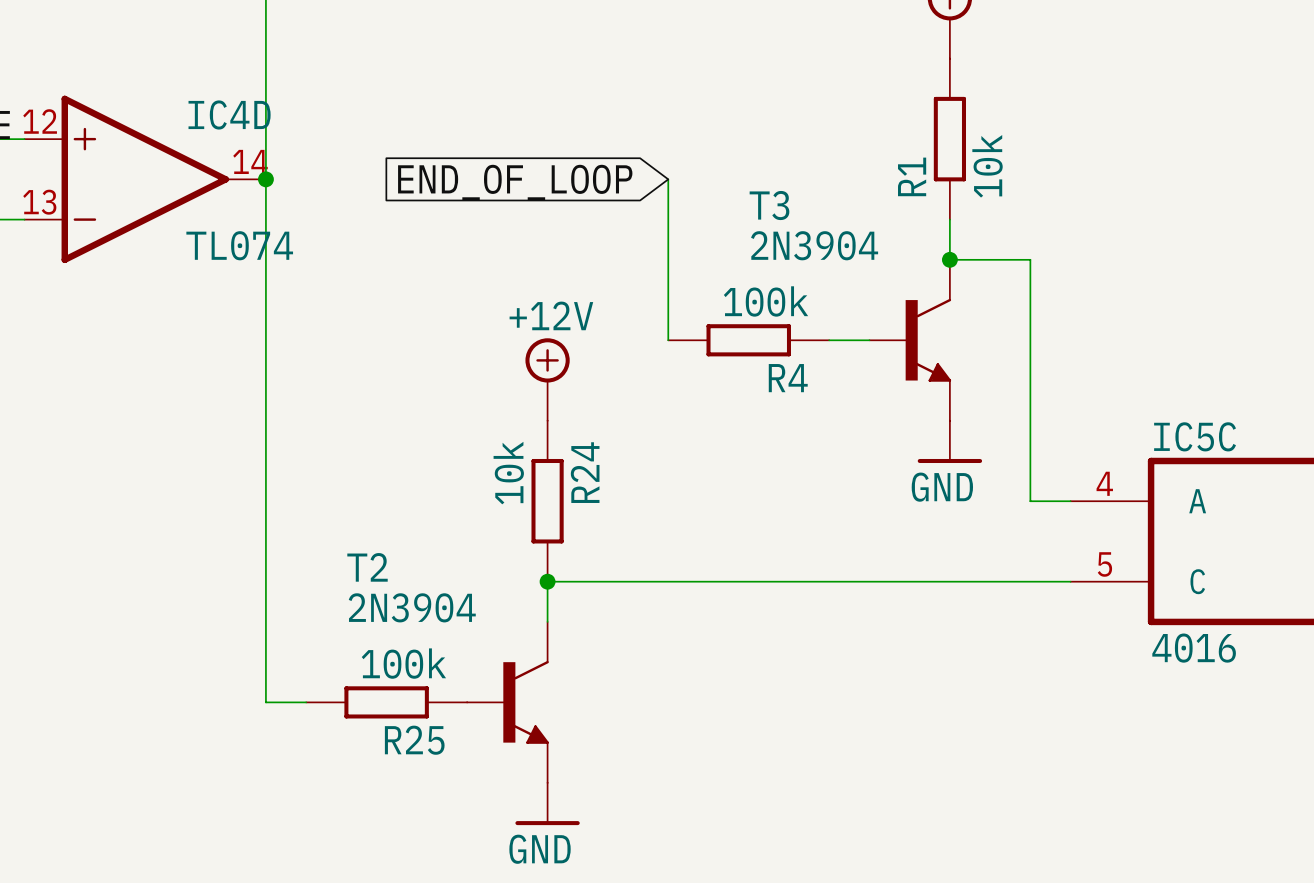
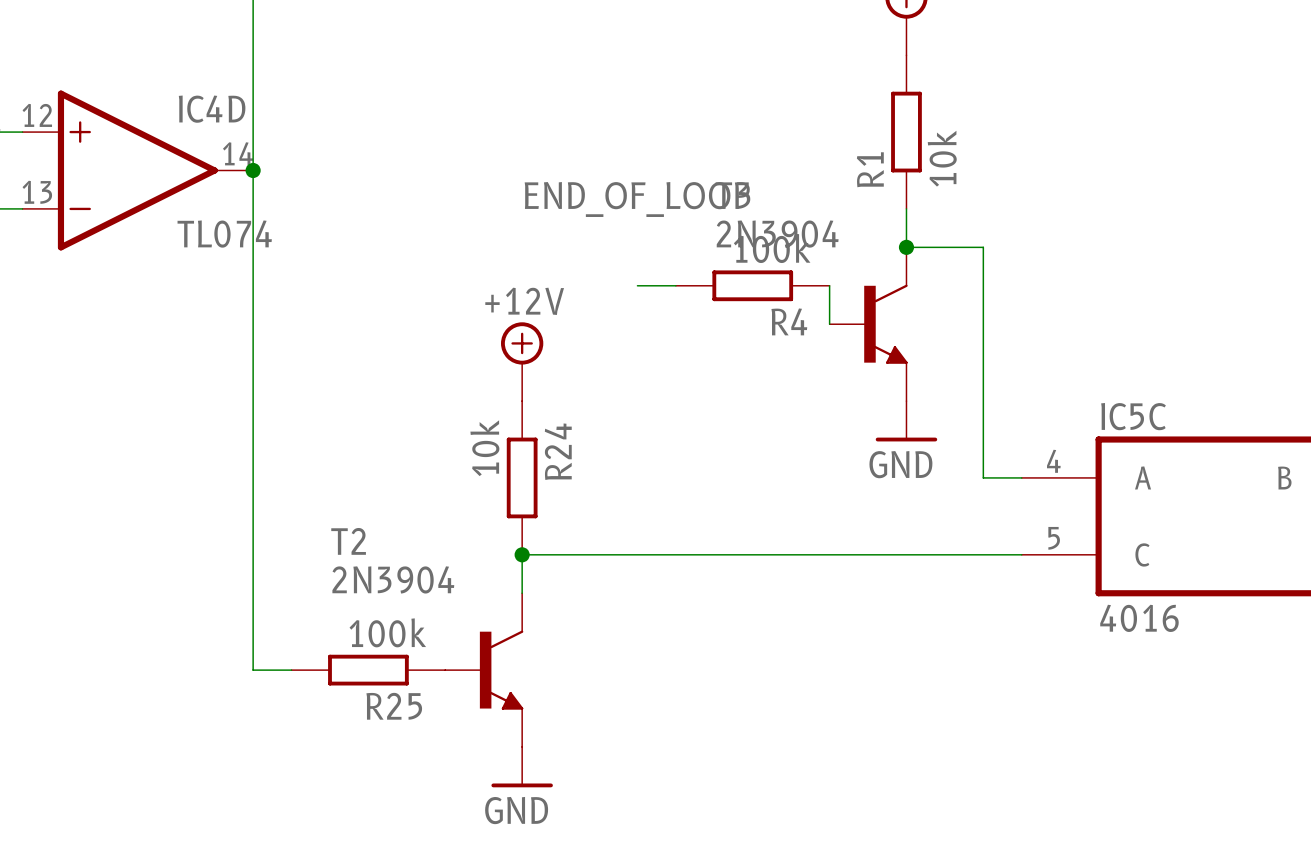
wire: (668, 179) (668, 340) -> none
global label: END_OF_LOOP (515, 182) -> none
label: none -> END_OF_LOOP (637, 199)
wire: none -> (637, 285) (675, 285)
R4 position: (748, 340) -> (752, 285)
wire: (829, 340) (869, 340) -> (829, 285) (829, 324)

